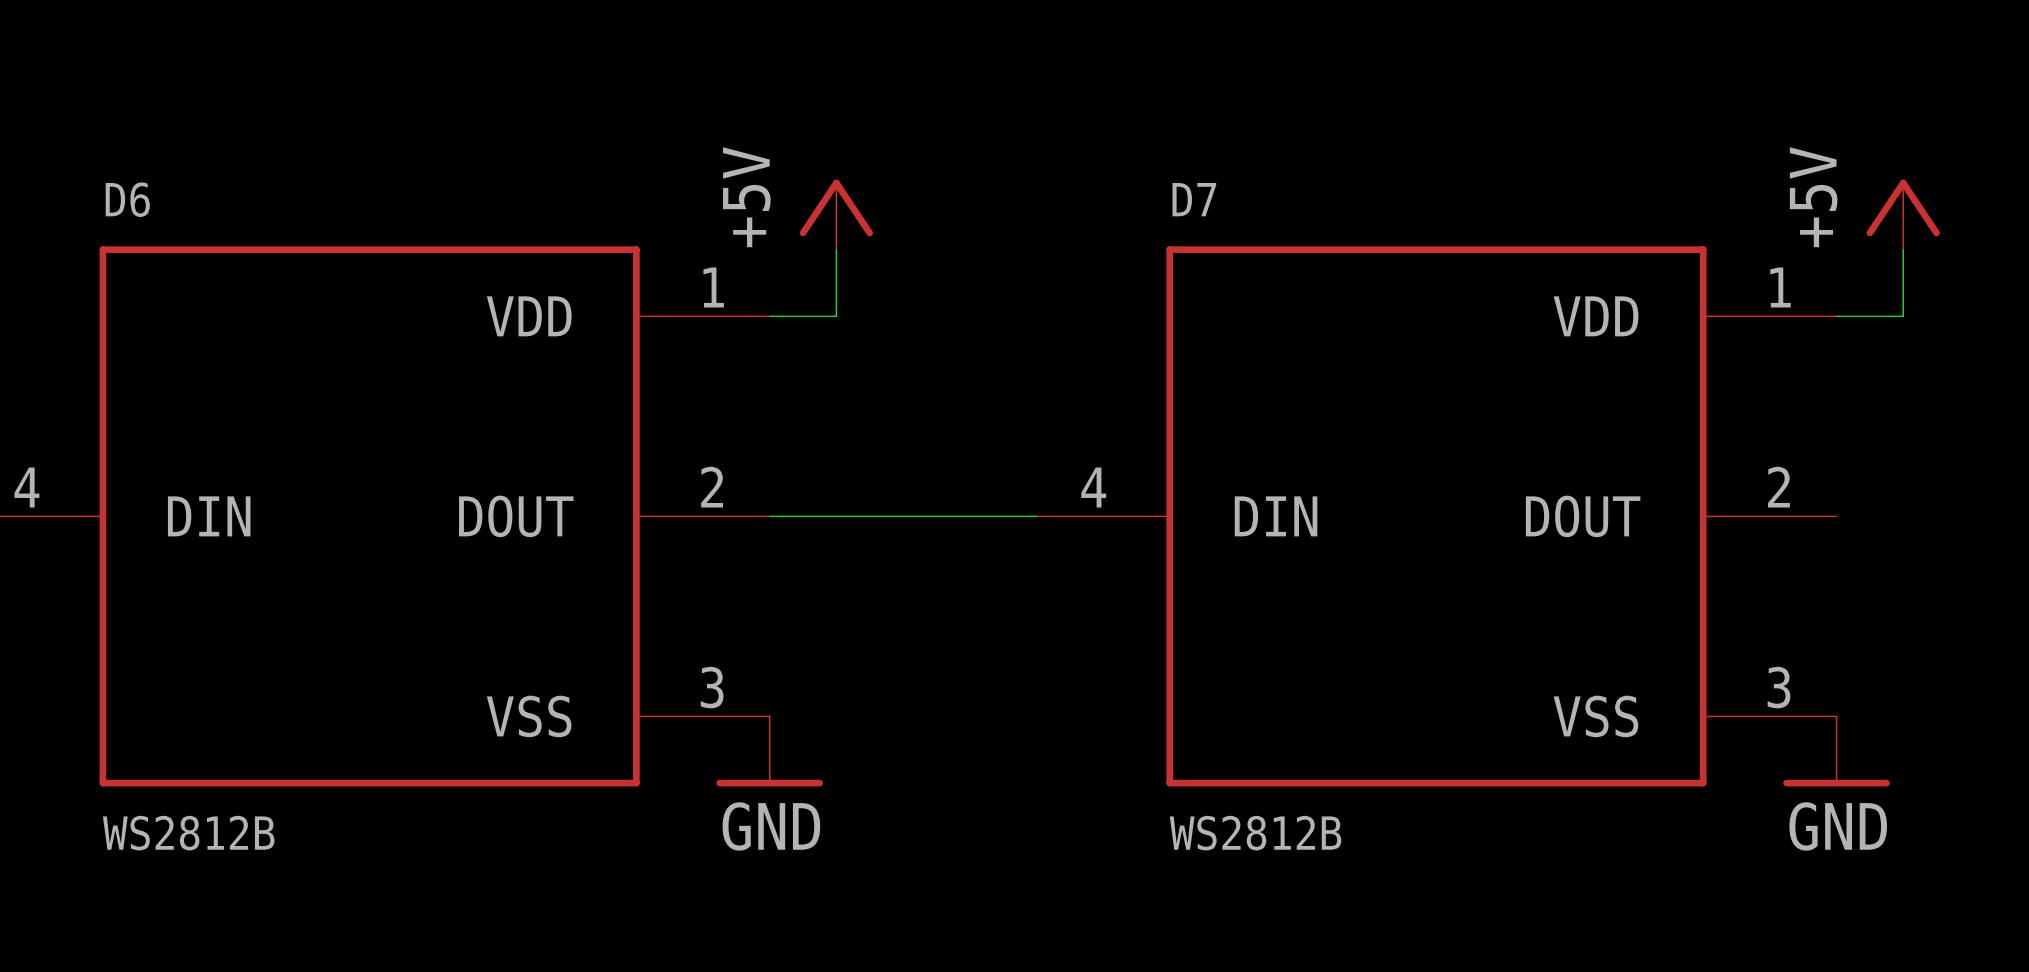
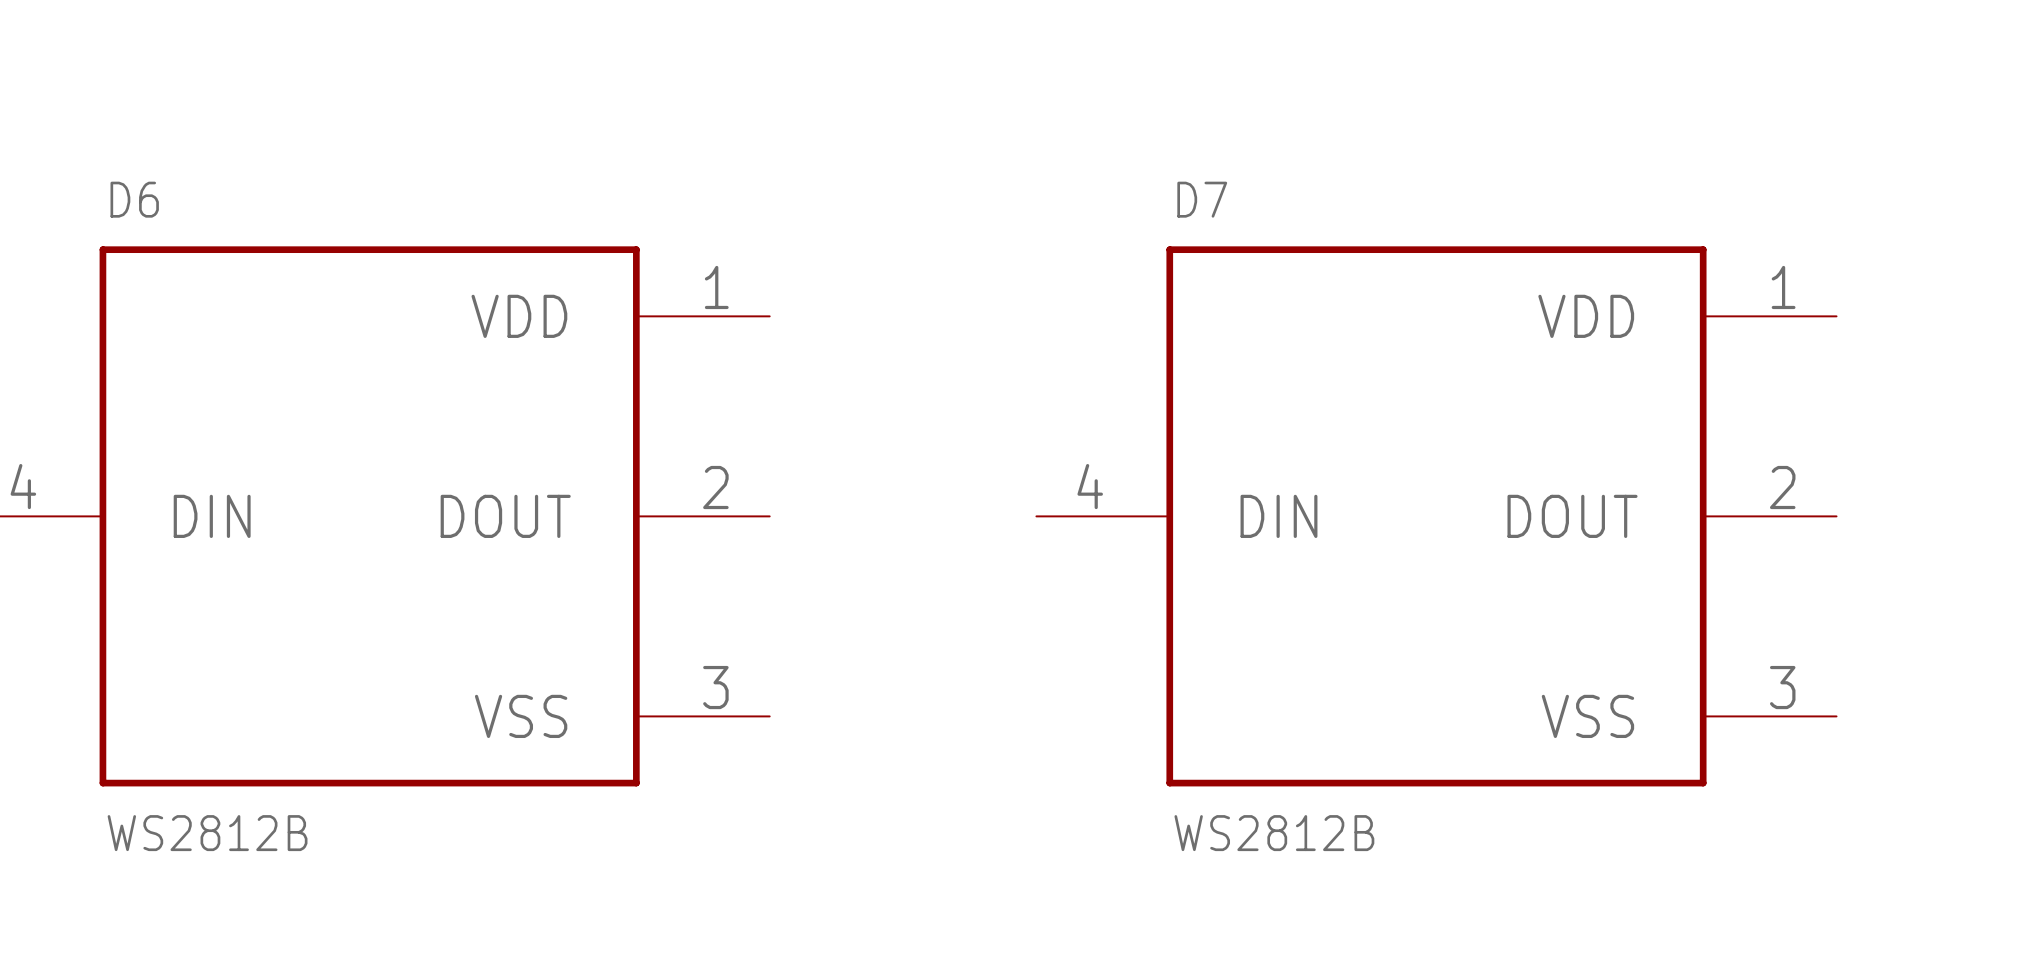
power symbol: +5V (836, 214) -> none
power symbol: +5V (1903, 214) -> none
wire: (836, 249) (836, 316) (769, 316) -> none
wire: (1903, 249) (1903, 316) (1836, 316) -> none
wire: (769, 516) (1036, 516) -> none
power symbol: GND (769, 751) -> none
power symbol: GND (1836, 751) -> none

